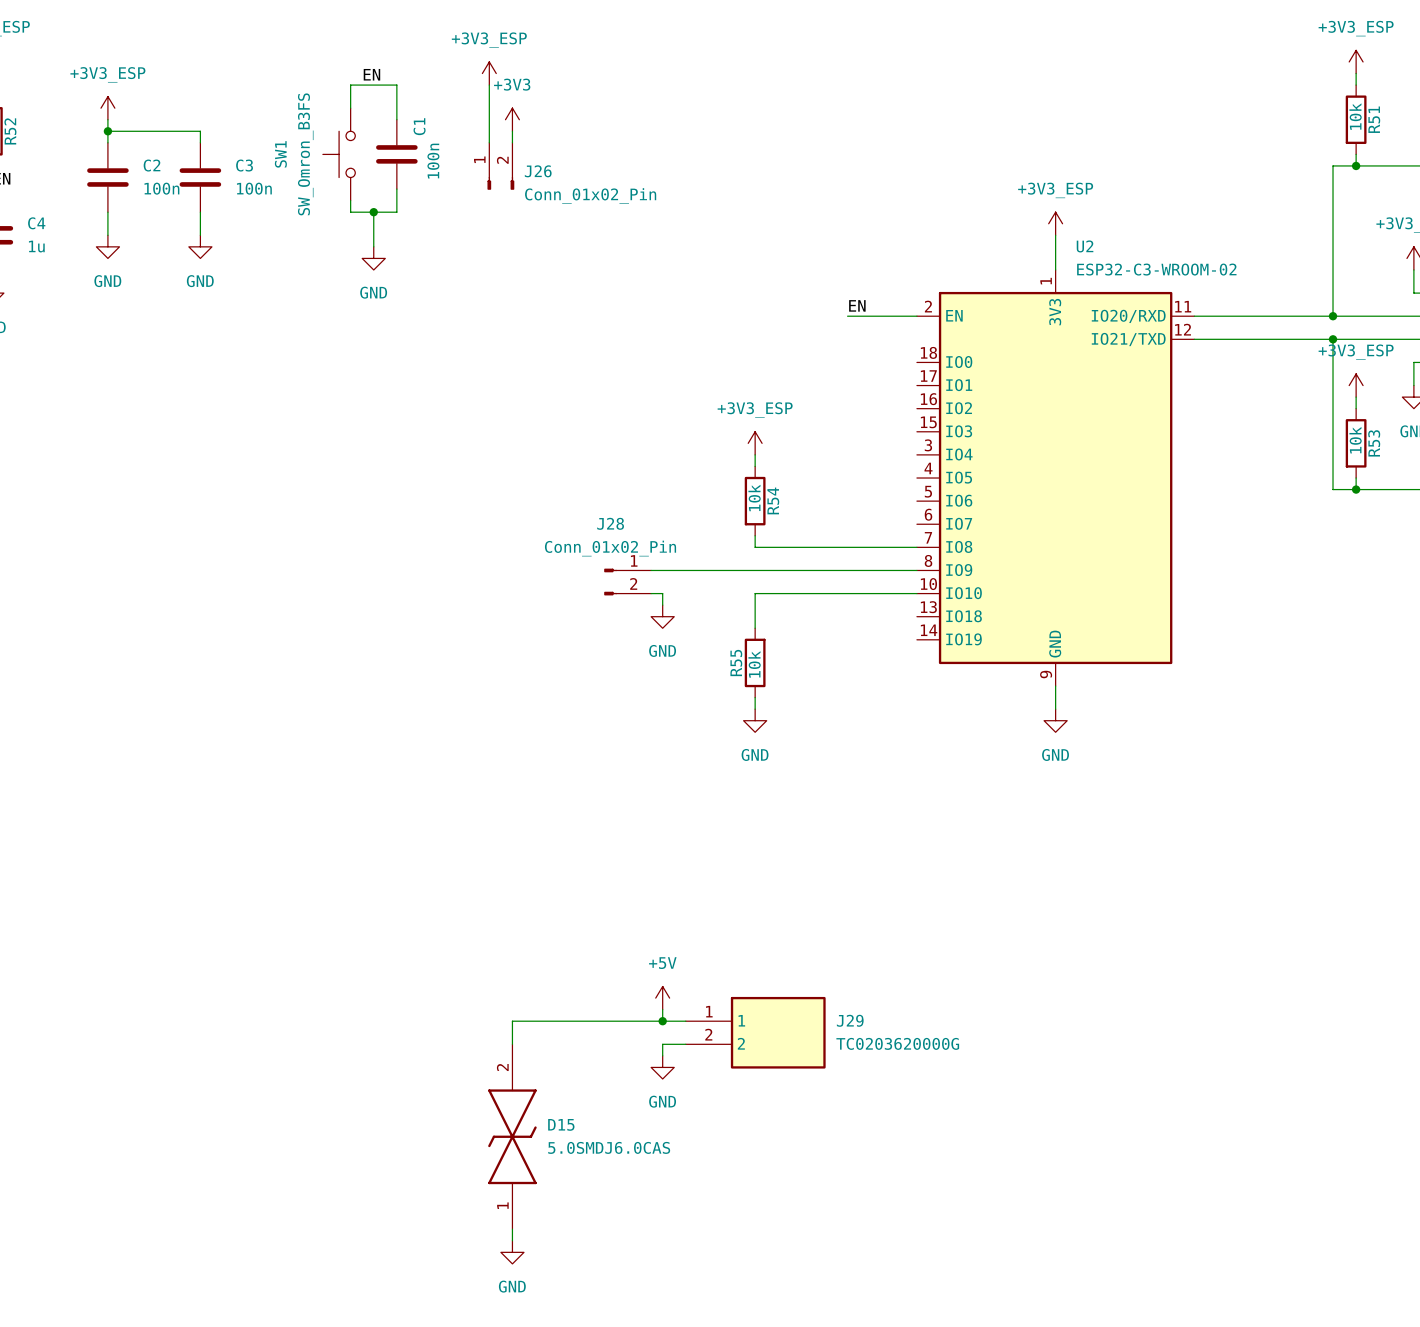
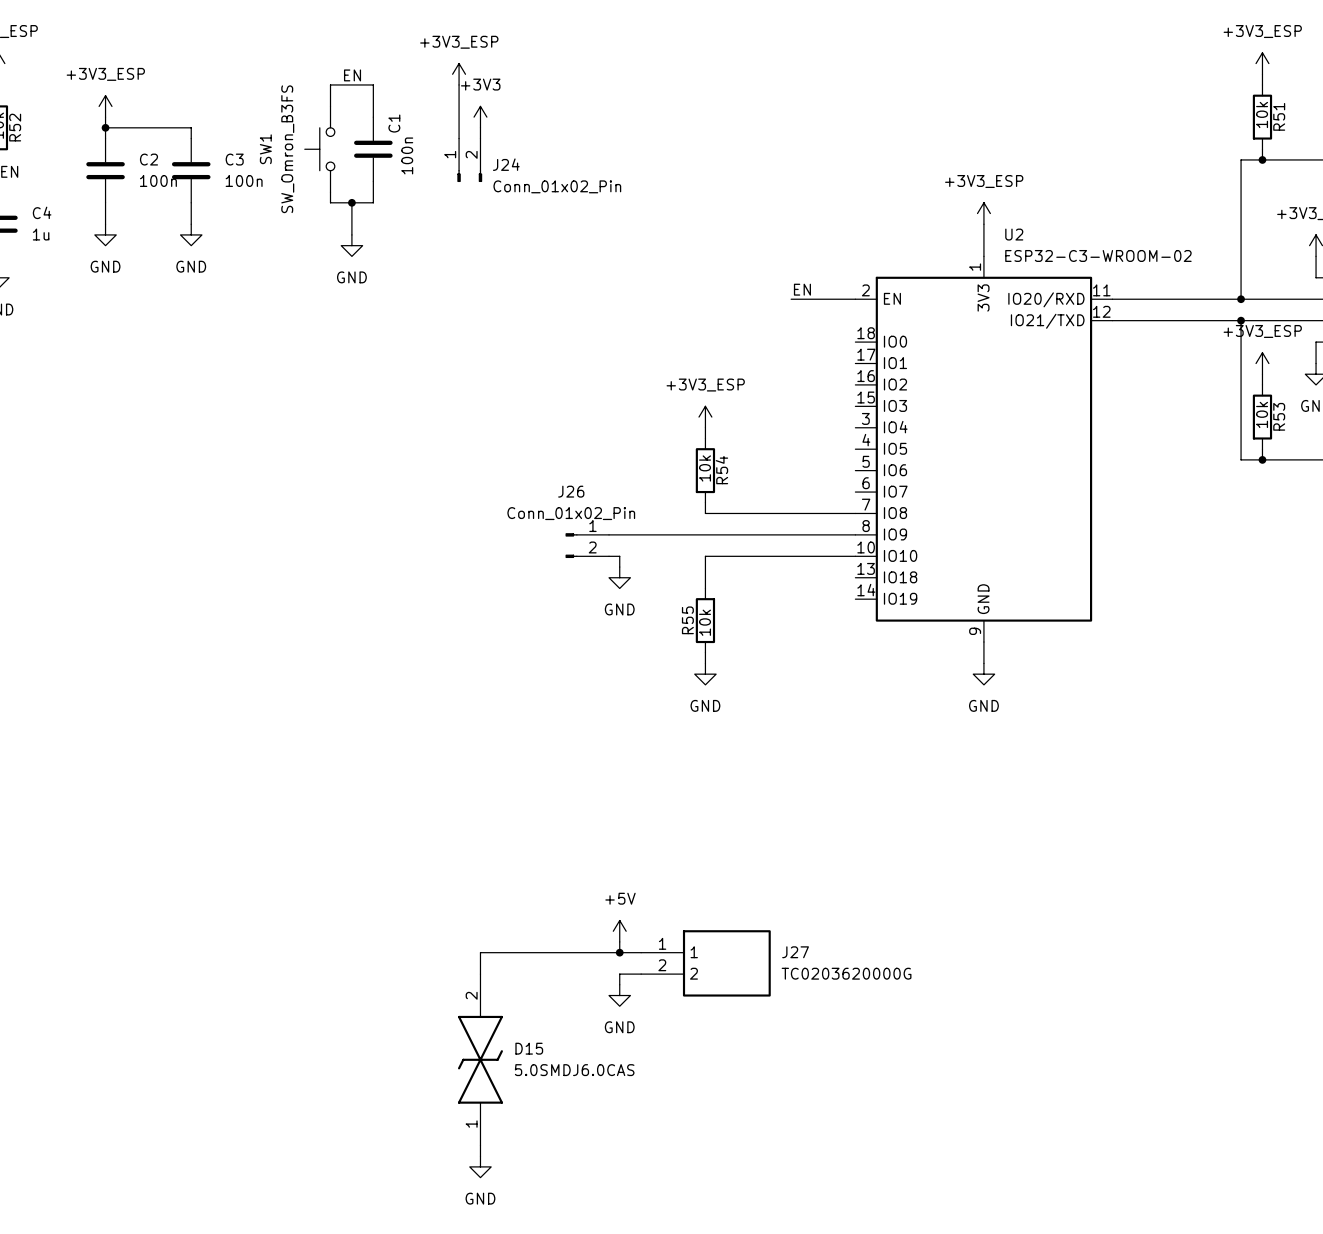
J26 name: J26 (538, 171) -> J24 (506, 164)
J28 name: J28 (610, 523) -> J26 (571, 491)
J29 name: J29 (850, 1020) -> J27 (795, 952)

